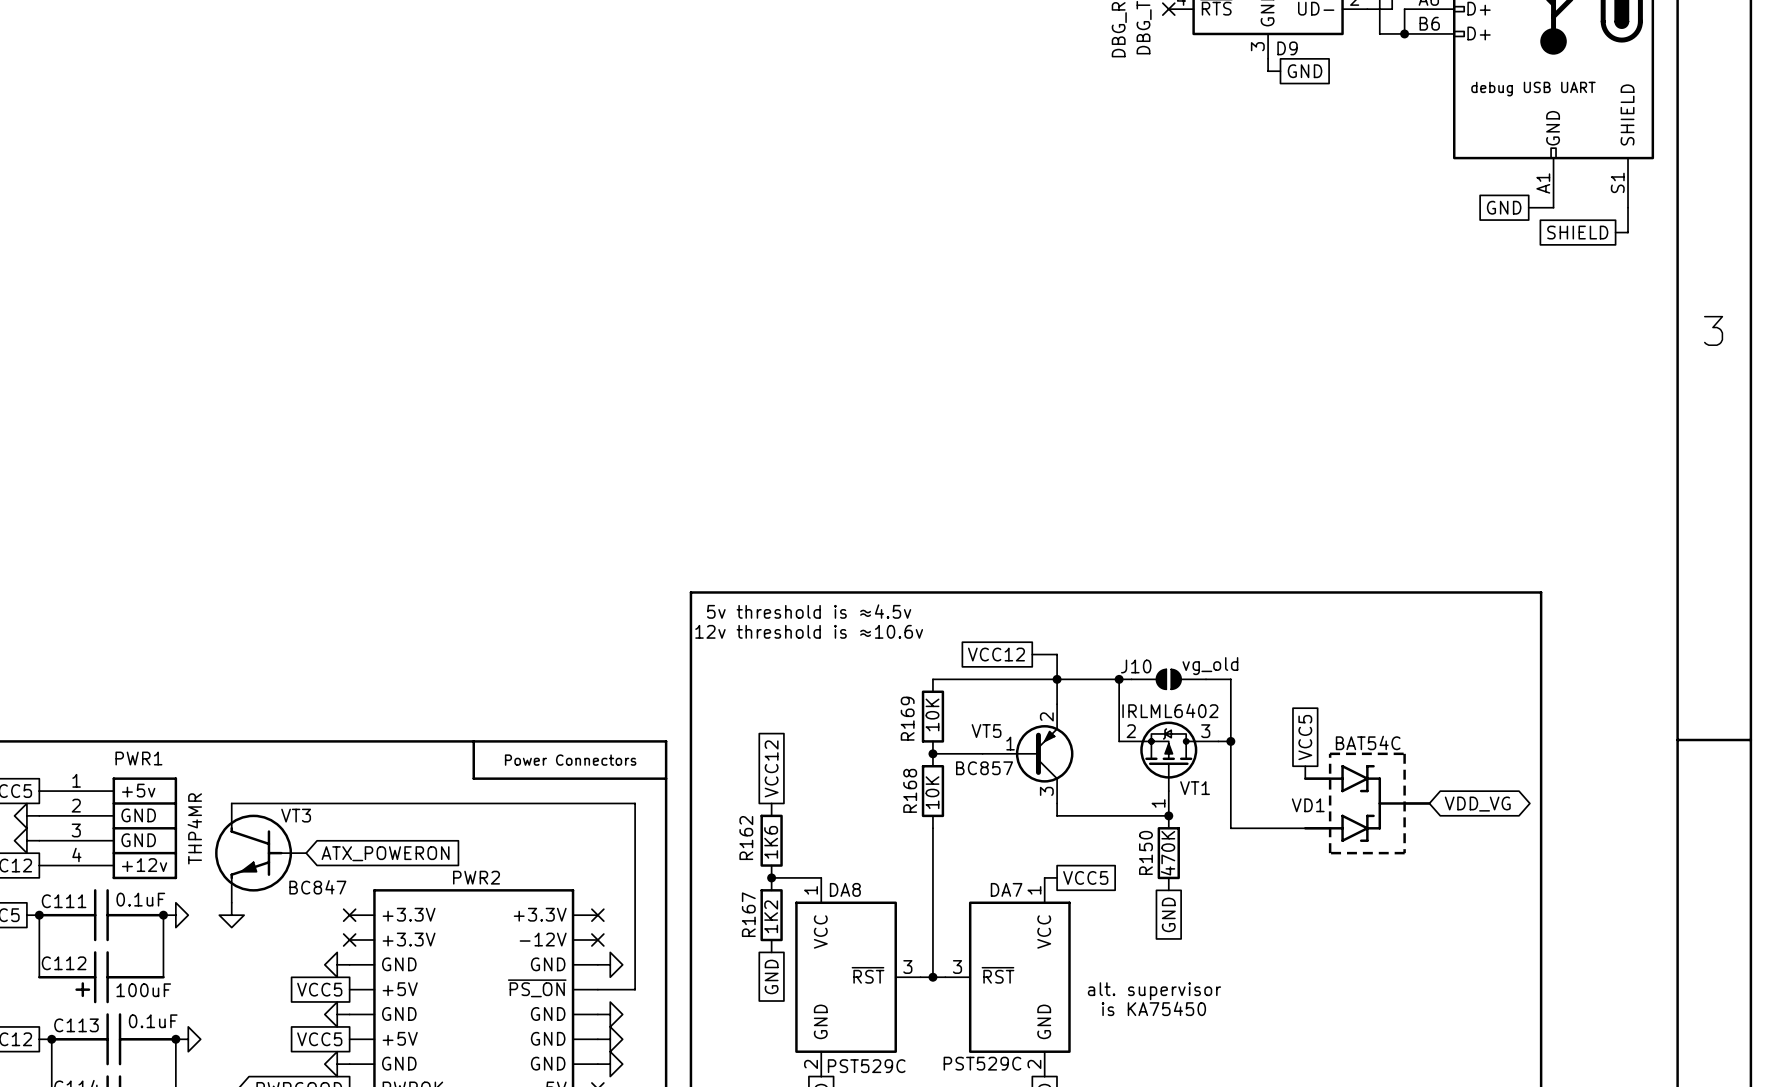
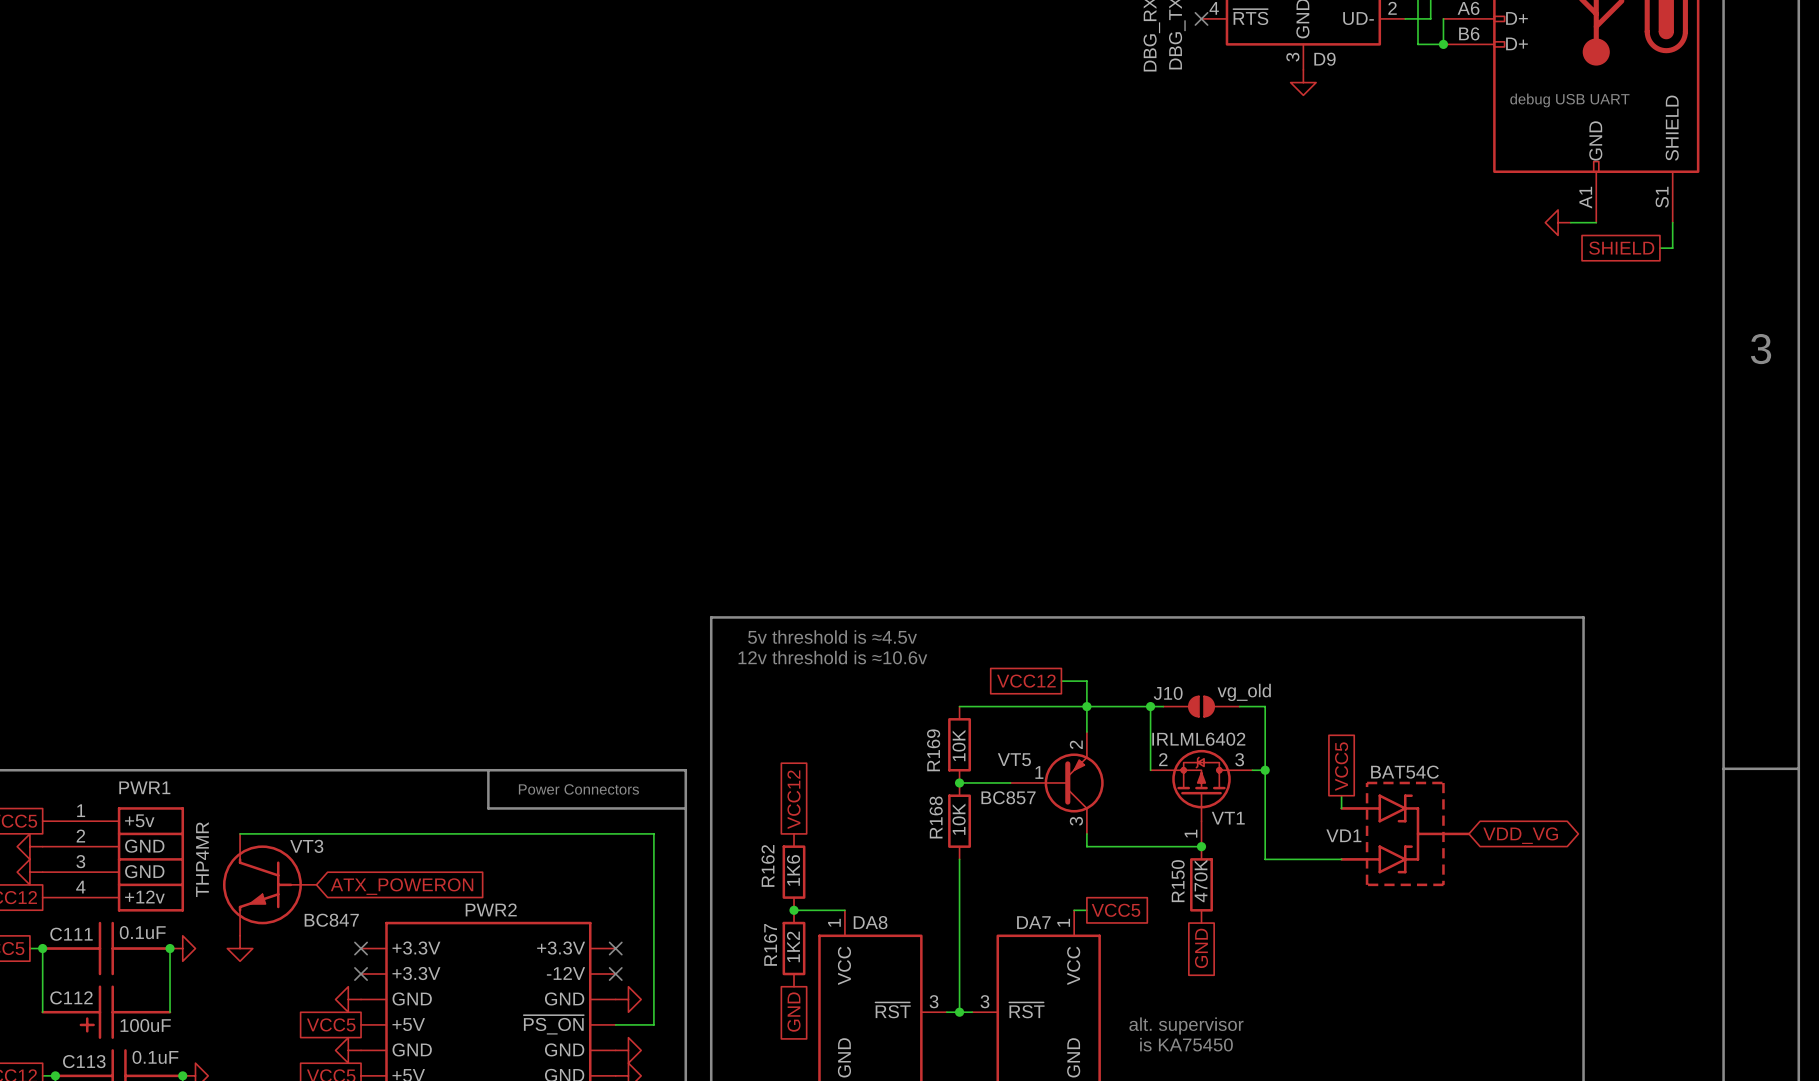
power symbol: none -> (1303, 82)
global label: GND (1305, 71) -> none
global label: GND (1504, 207) -> none
power symbol: none -> (1558, 222)

